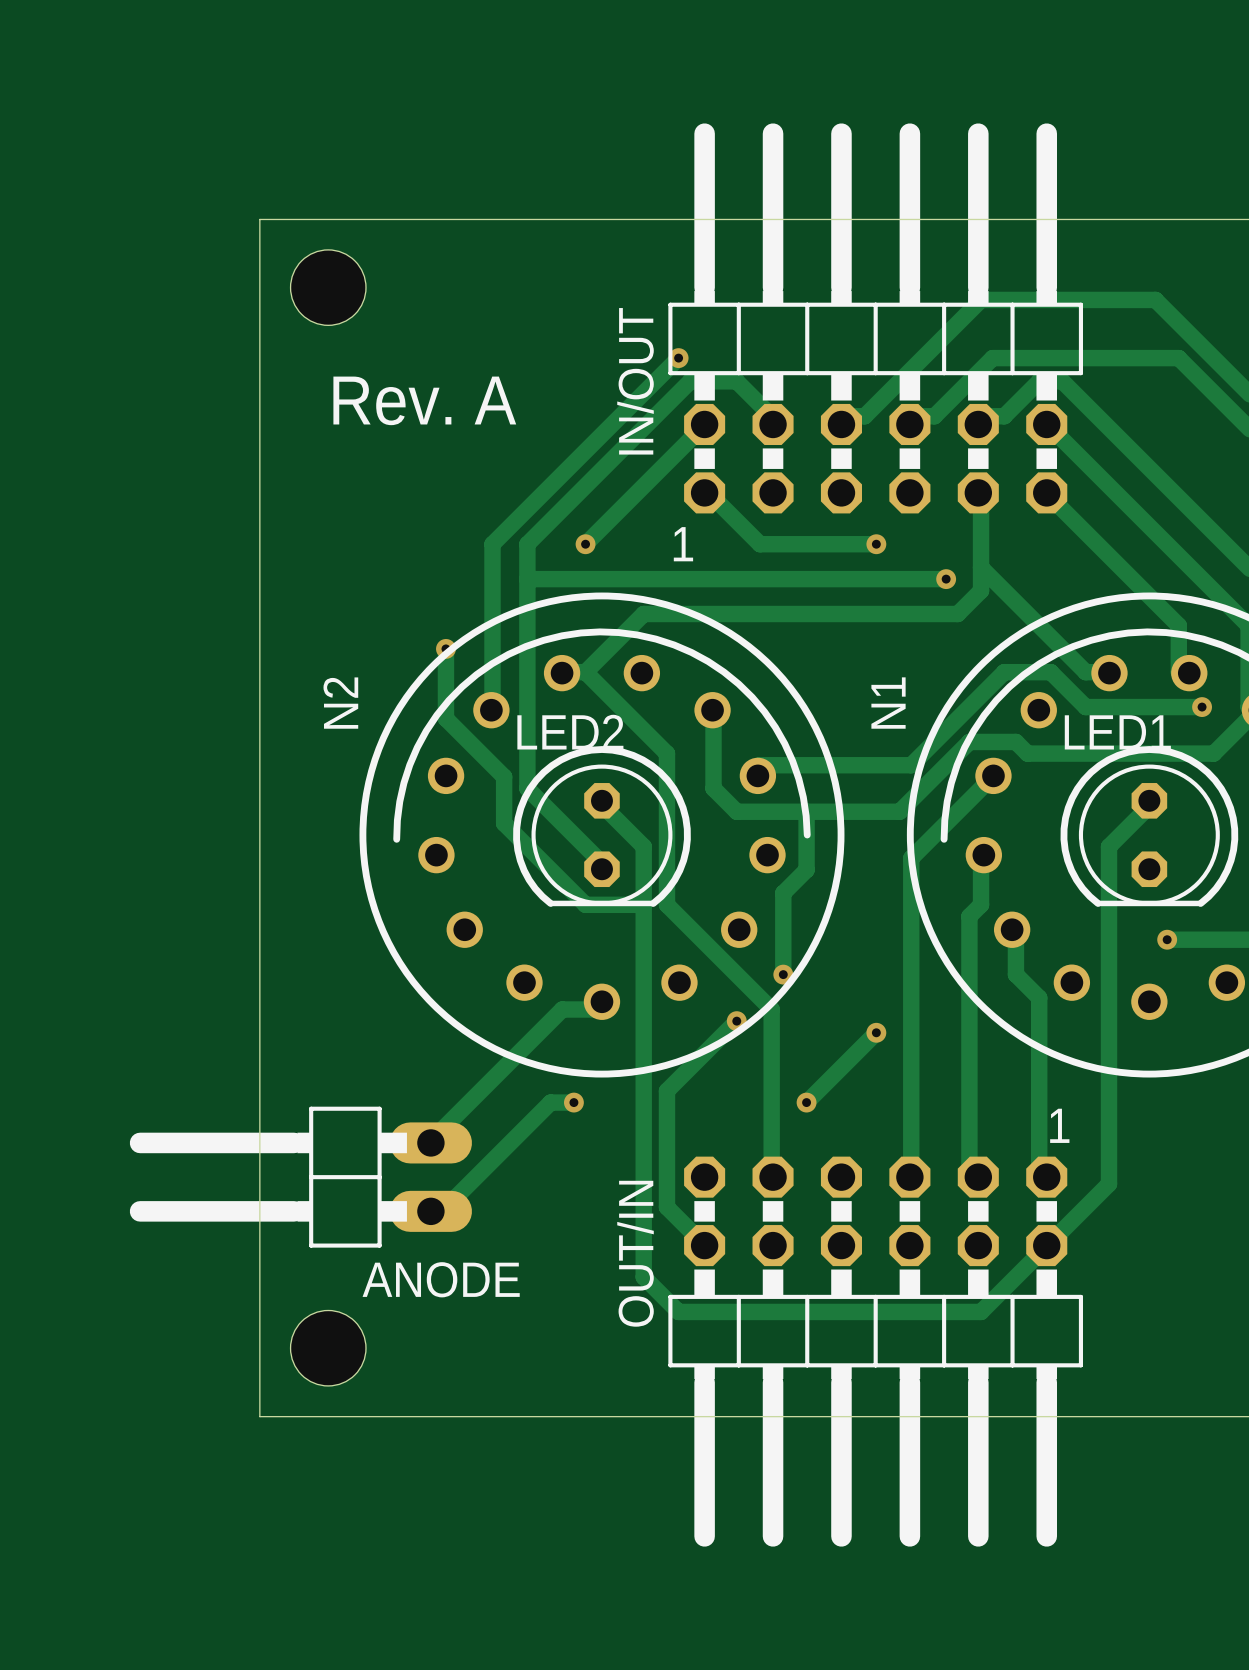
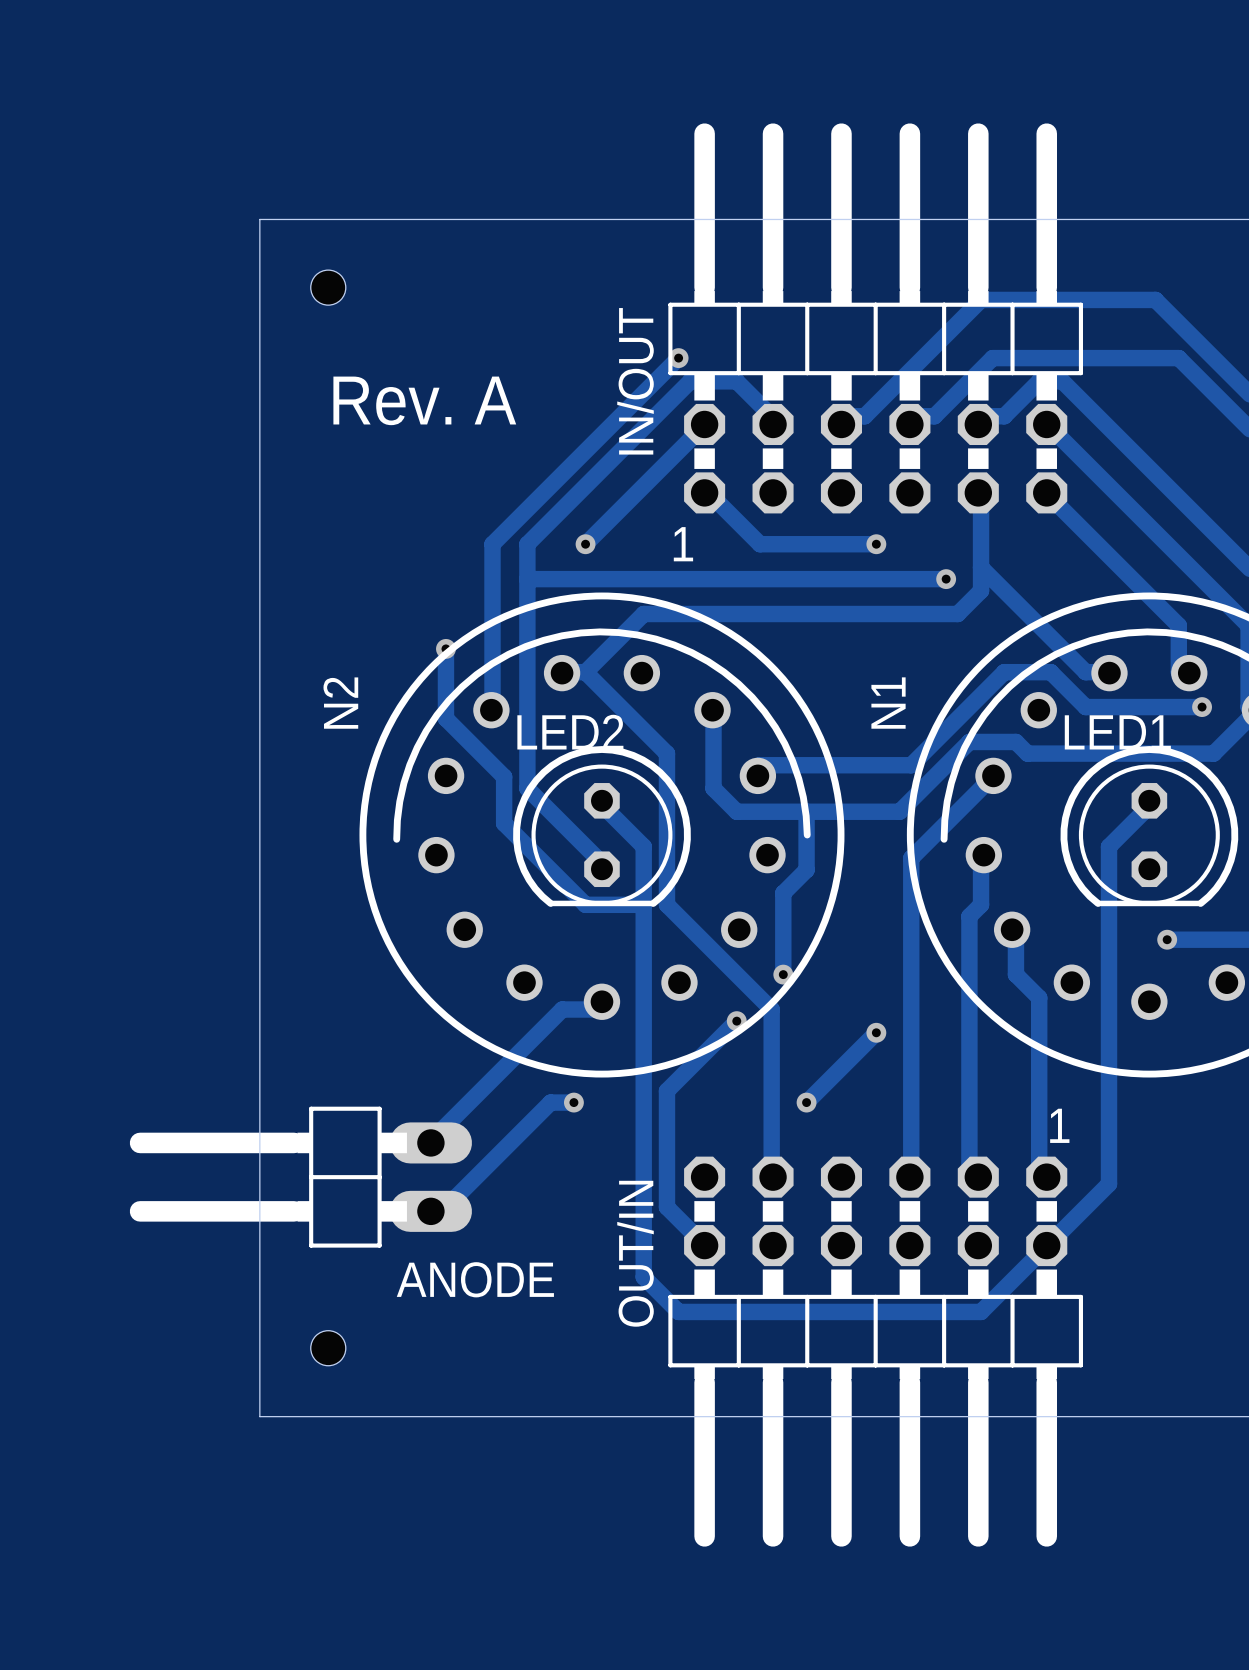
hole size: [290, 249, 366, 326] -> [310, 270, 346, 306]
ANODE name position: ANODE (441, 1279) -> ANODE (475, 1279)
hole size: [290, 1310, 366, 1386] -> [310, 1330, 346, 1366]

